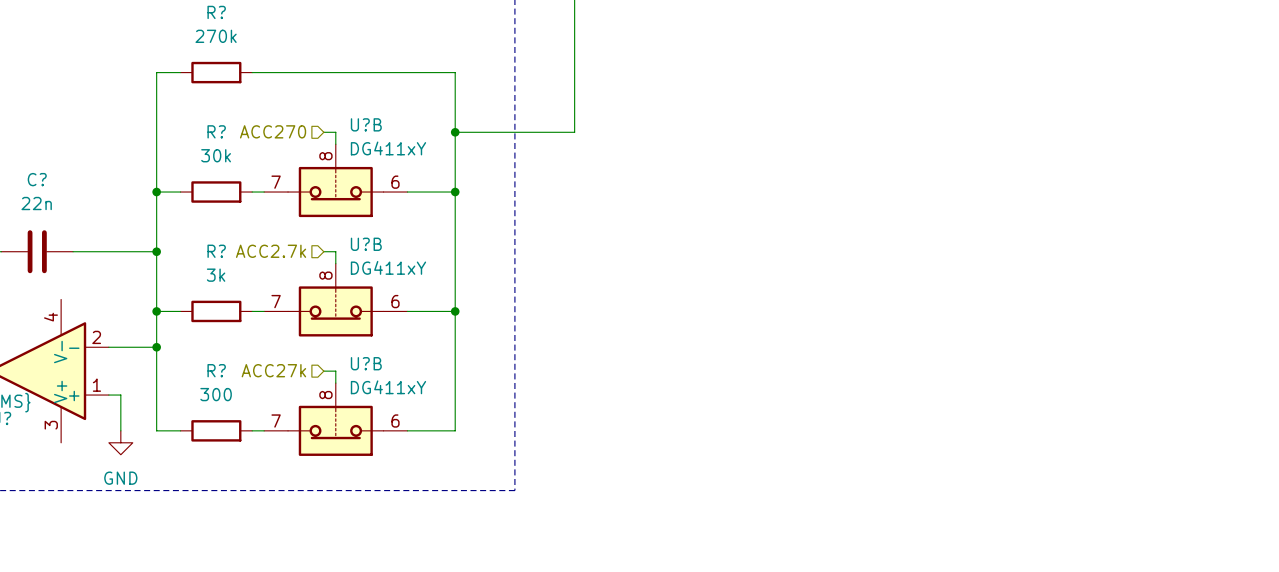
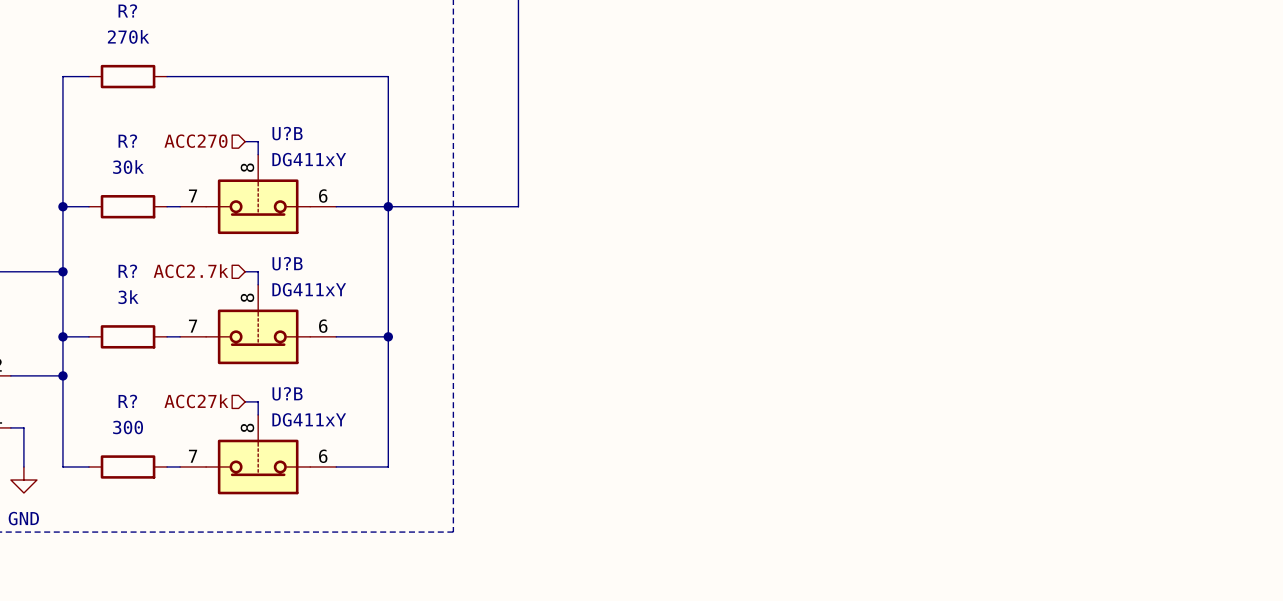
wire: (455, 132) (574, 132) -> (388, 206) (518, 206) (518, 141)
junction: (455, 132) -> none

